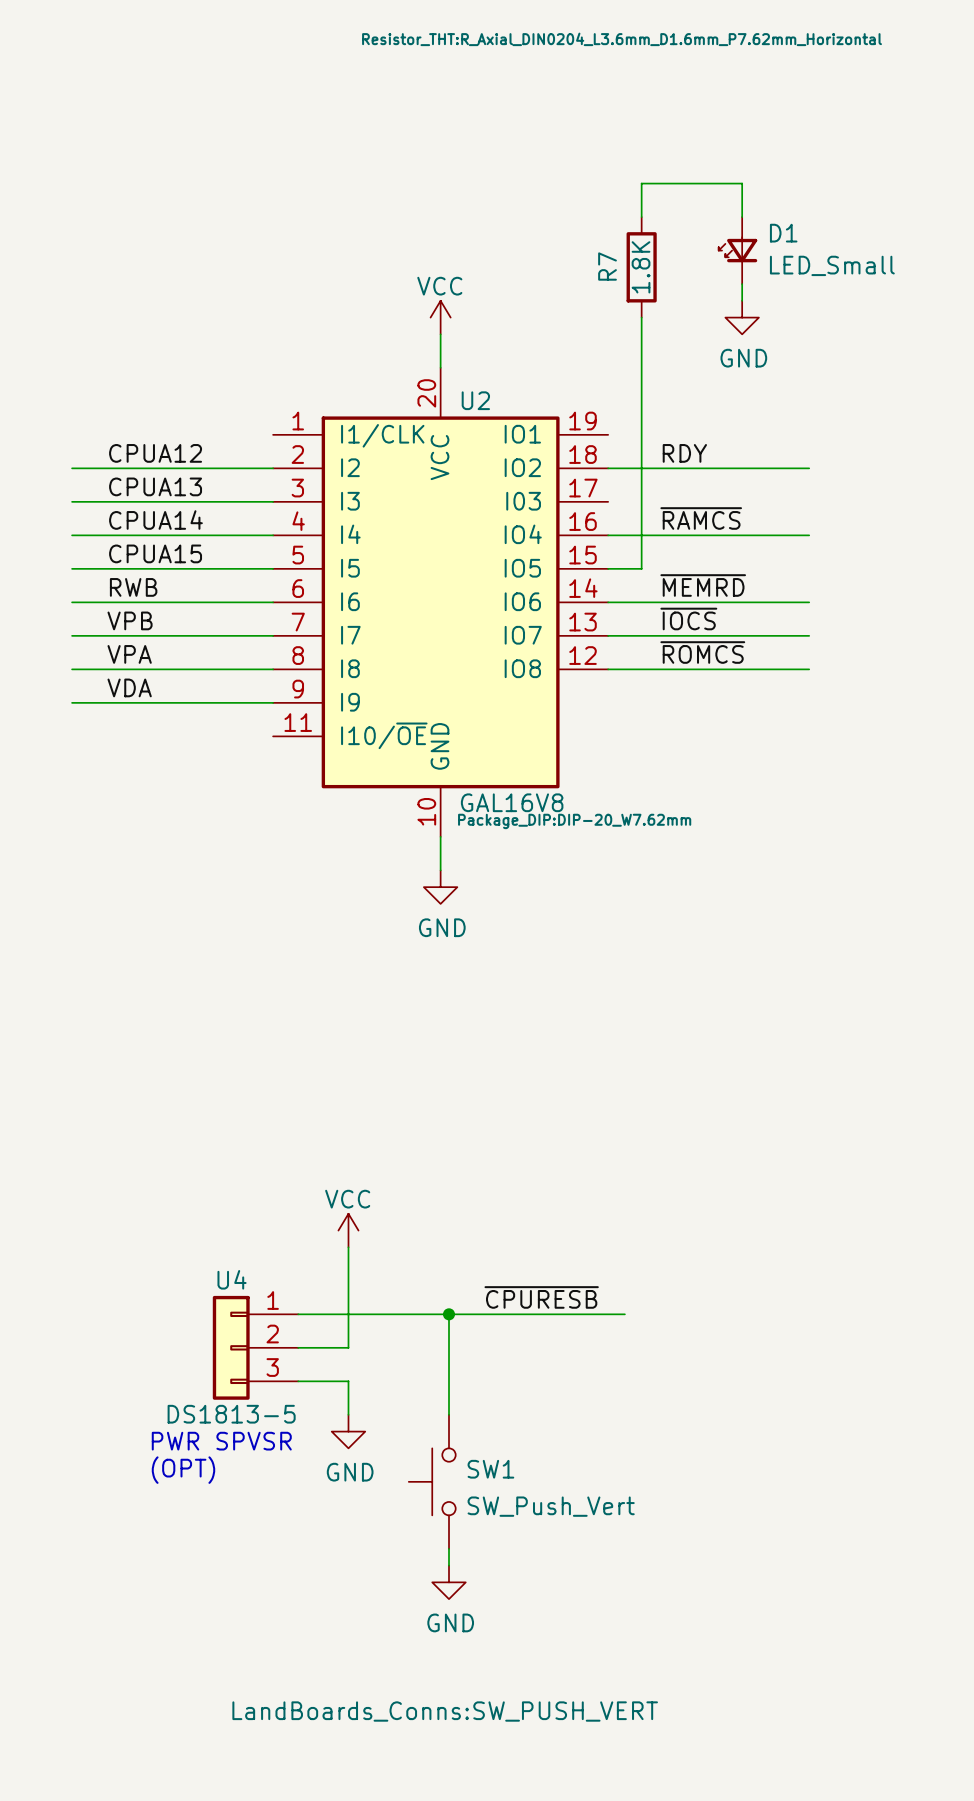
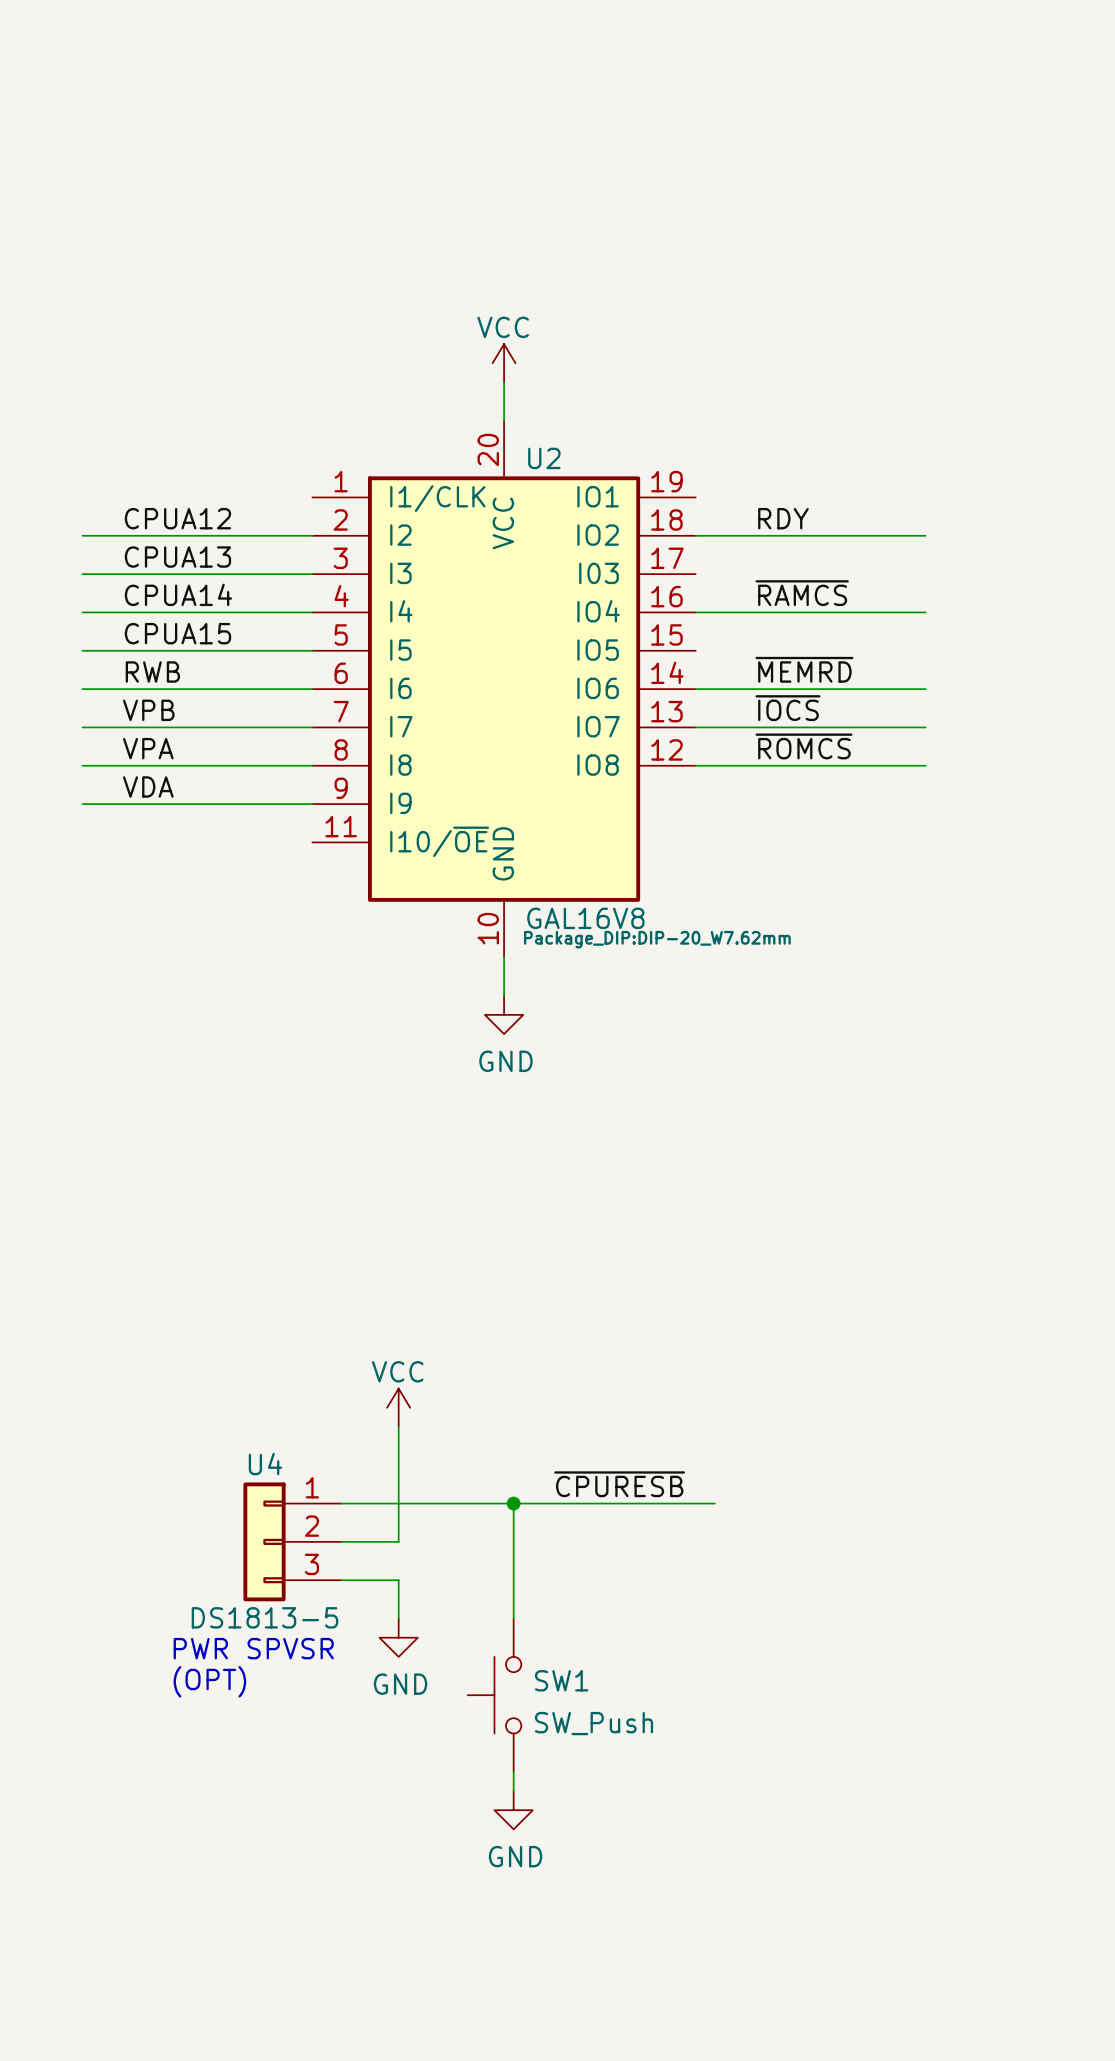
wire: (641, 217) (641, 183) (742, 183) (742, 217) -> none
D1: LED_Small (737, 250) -> none
R7: 1.8K (641, 267) -> none
wire: (742, 284) (742, 300) -> none
wire: (641, 317) (641, 568) (608, 568) -> none
power symbol: GND (742, 317) -> none
SW1 value: SW_Push_Vert (551, 1506) -> SW_Push (594, 1723)
SW1 text: LandBoards_Conns:SW_PUSH_VERT (445, 1711) -> none

